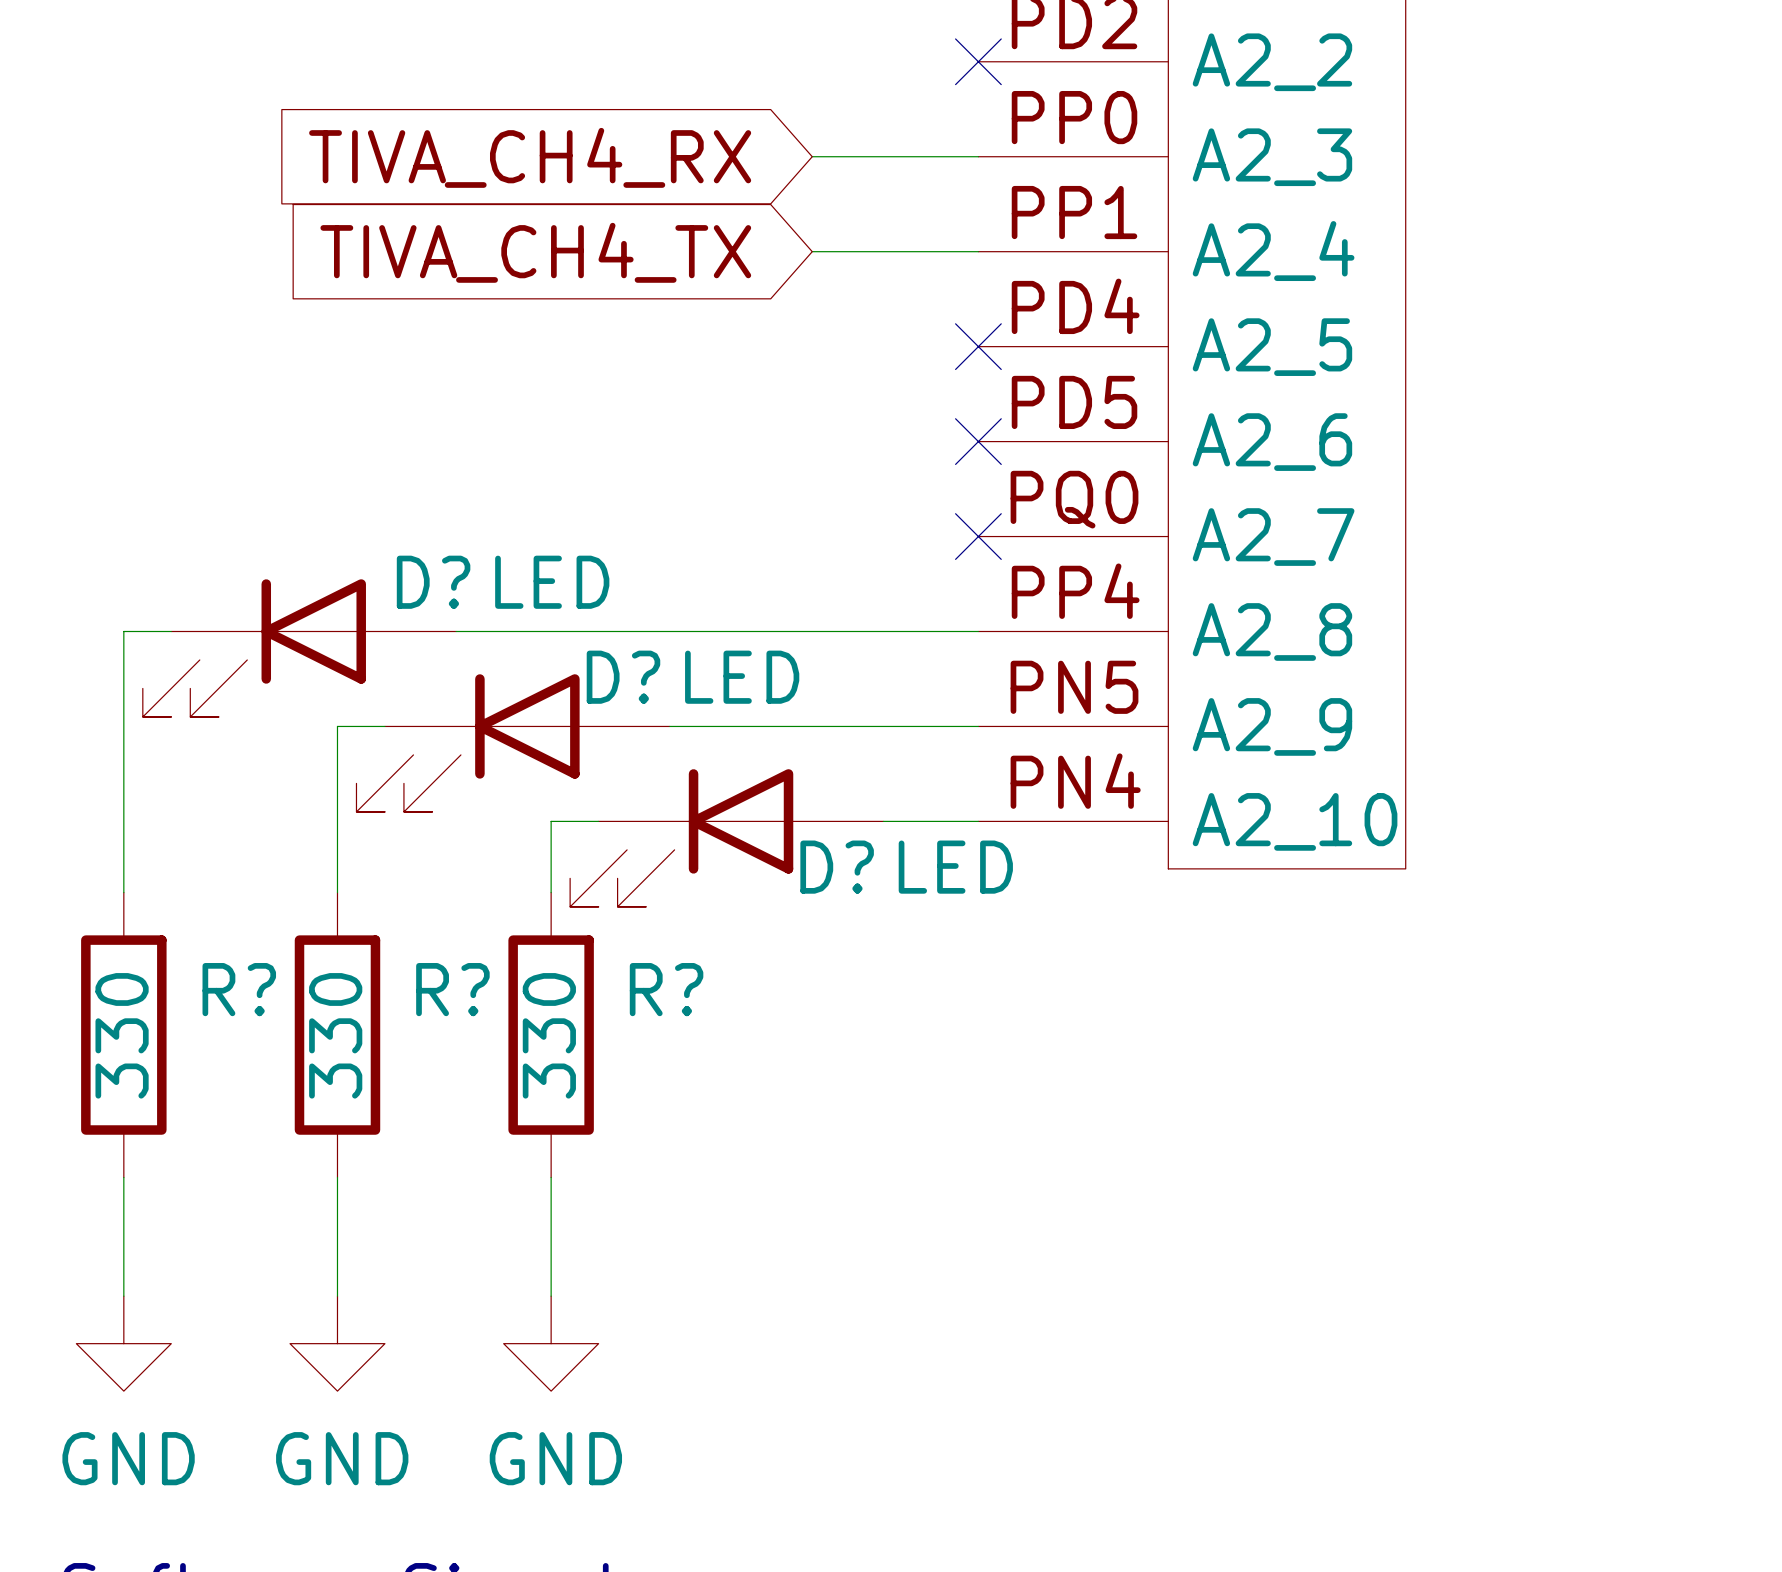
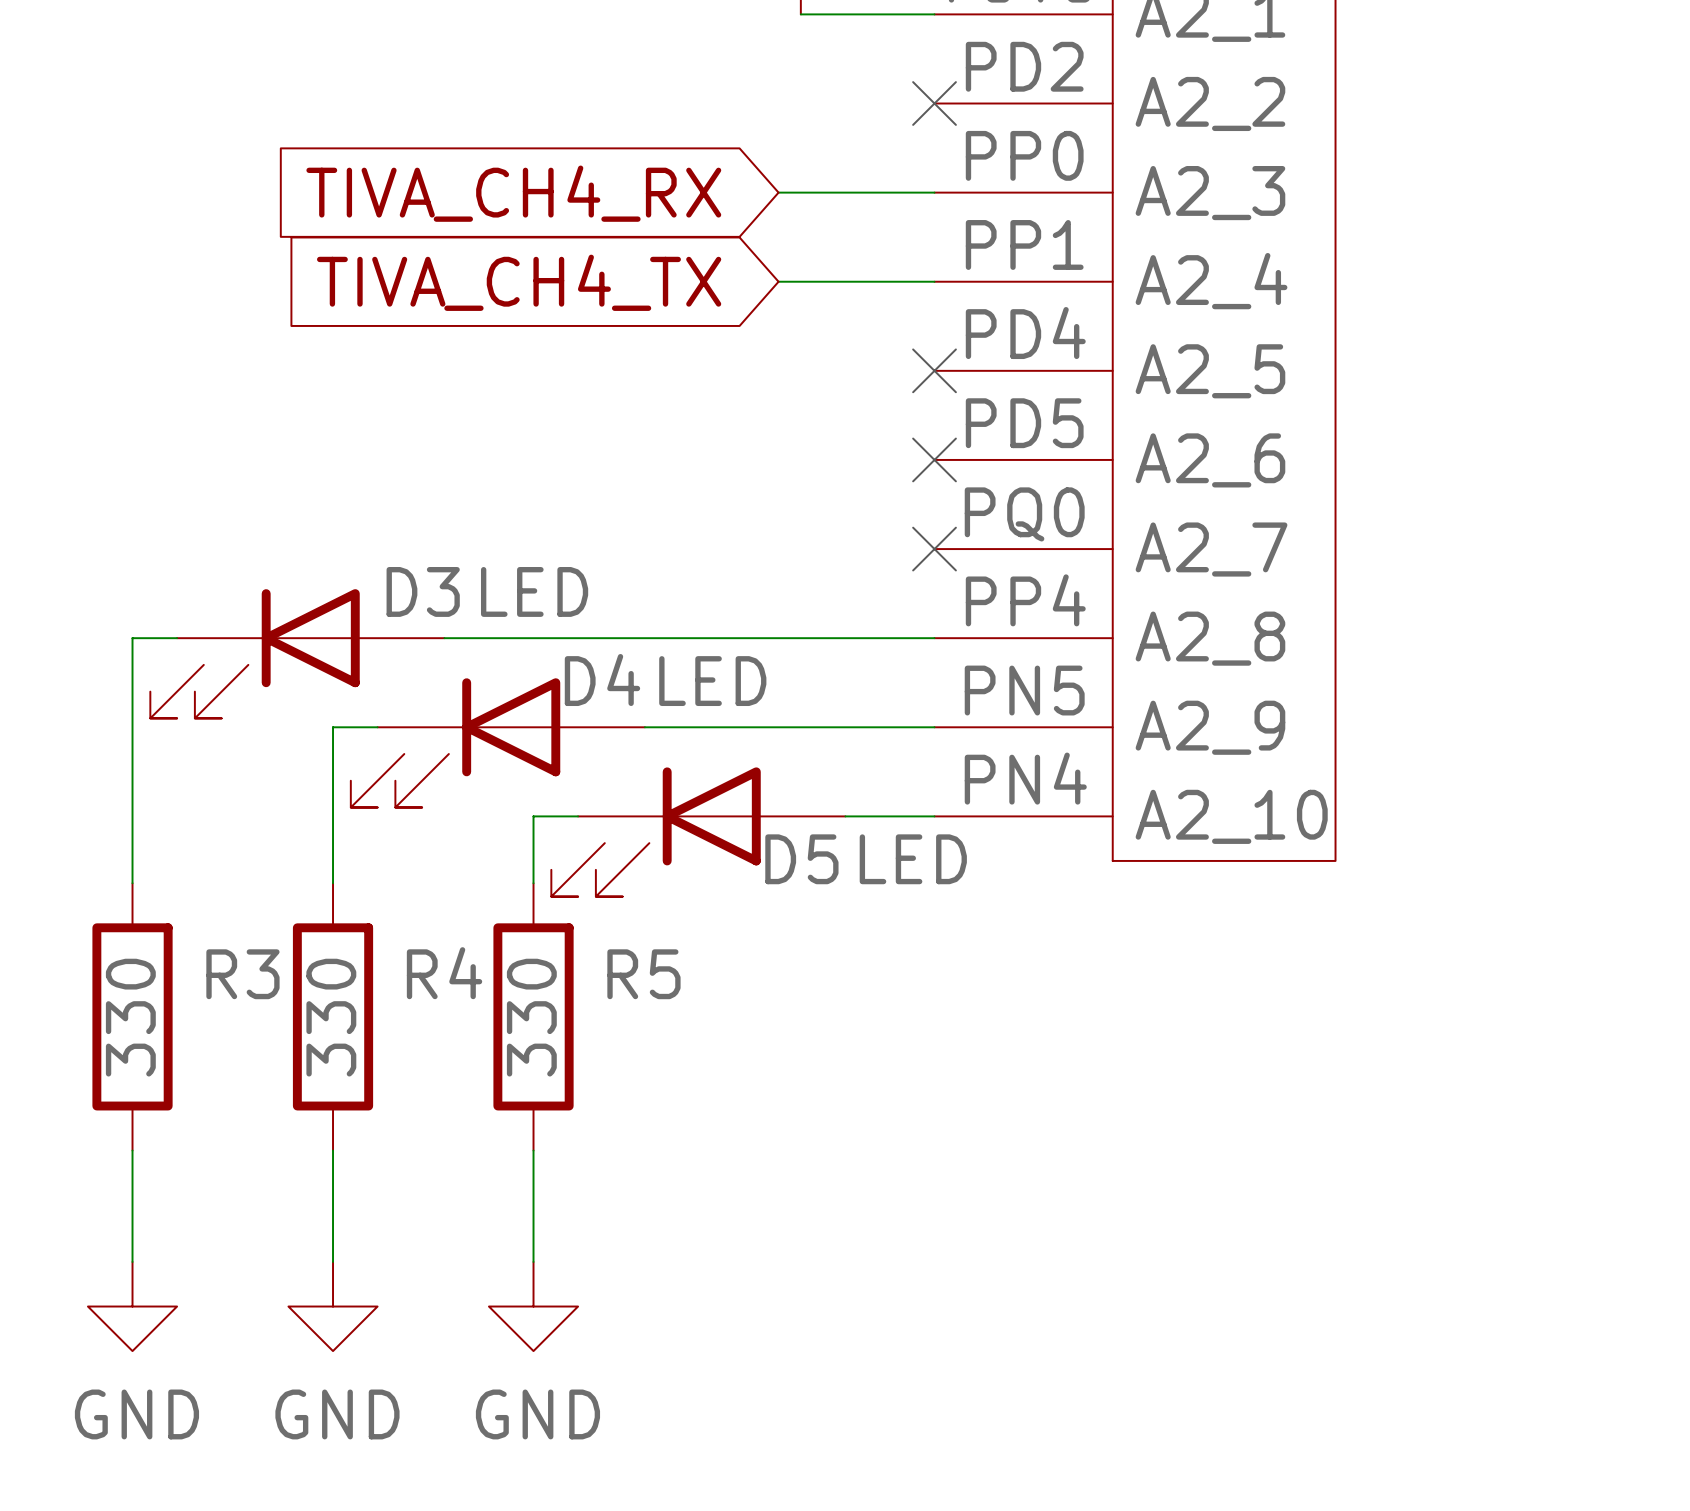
D? name: D? (433, 582) -> D3 (423, 591)
D? name: D? (623, 677) -> D4 (602, 680)
D? name: D? (837, 867) -> D5 (801, 859)
R? name: R? (239, 989) -> R3 (242, 974)
R? name: R? (452, 989) -> R4 (444, 973)
R? name: R? (666, 989) -> R5 (643, 974)

